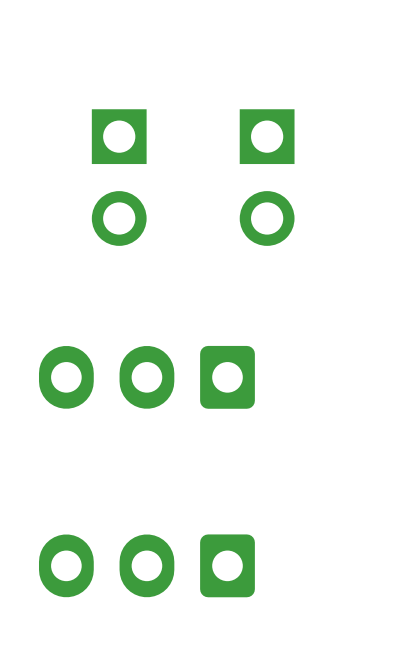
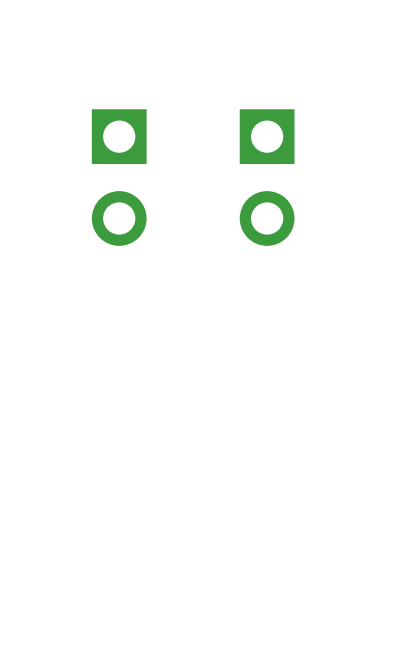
part: (146, 377) -> none
part: (146, 565) -> none

